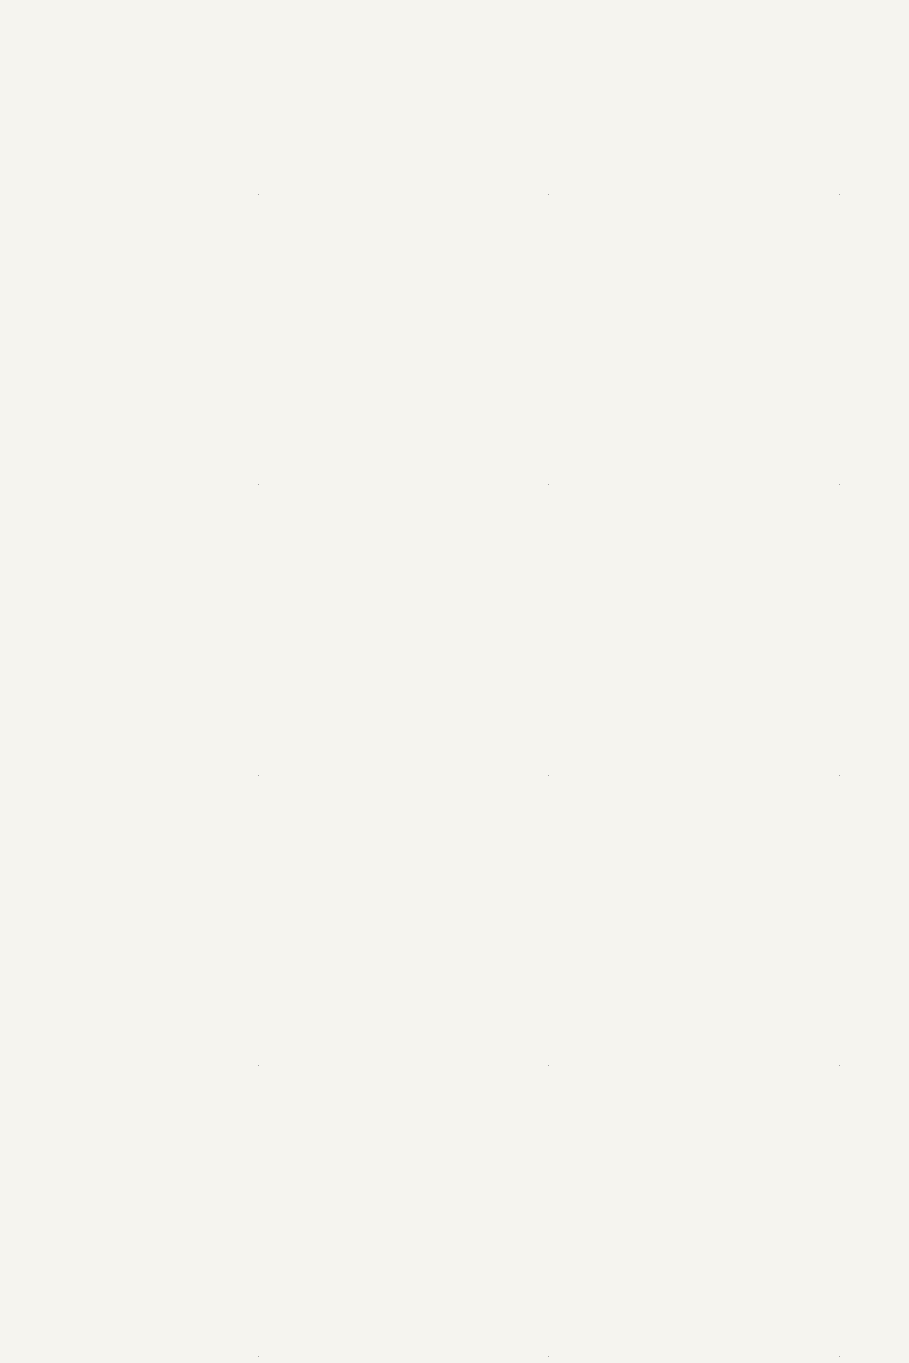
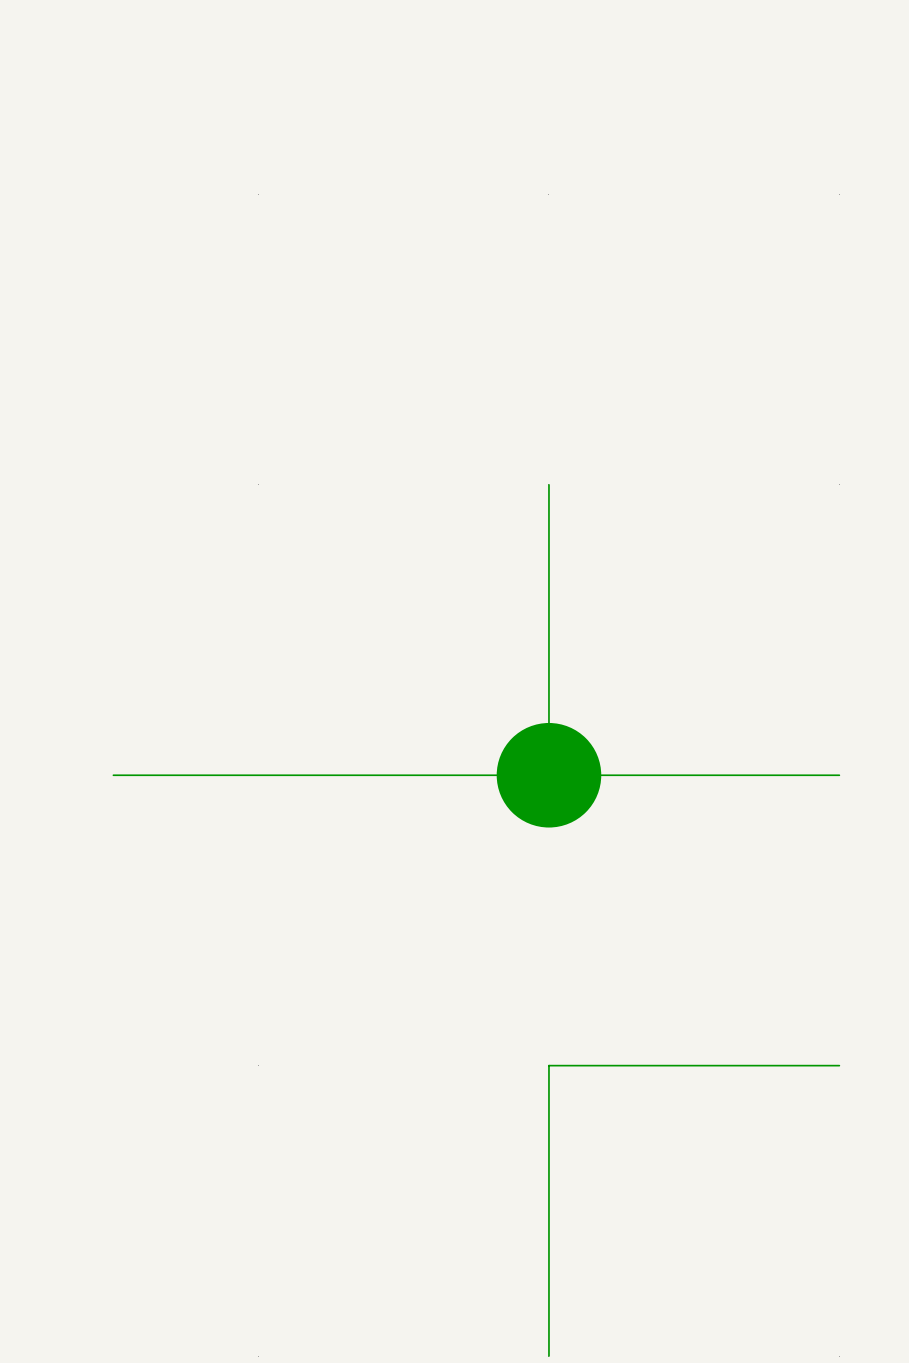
wire: none -> (548, 484) (548, 775)
wire: none -> (113, 775) (839, 775)
junction: none -> (548, 775)
wire: none -> (839, 1065) (548, 1065) (548, 1356)

